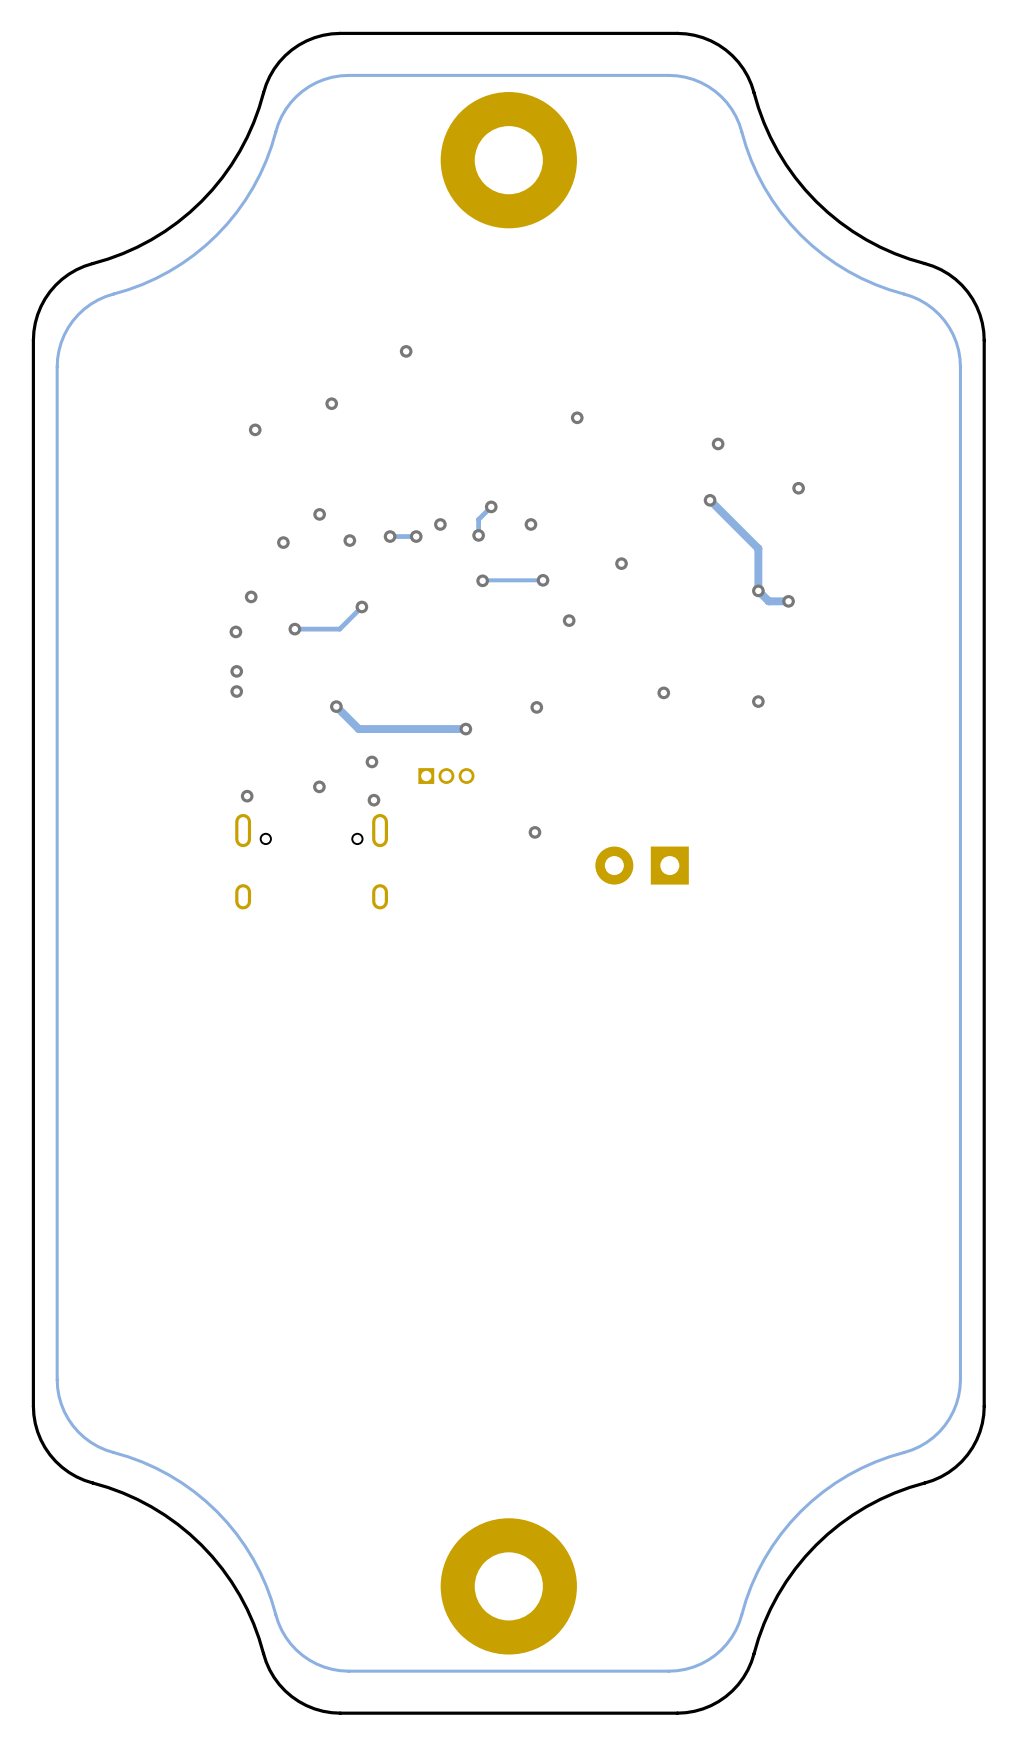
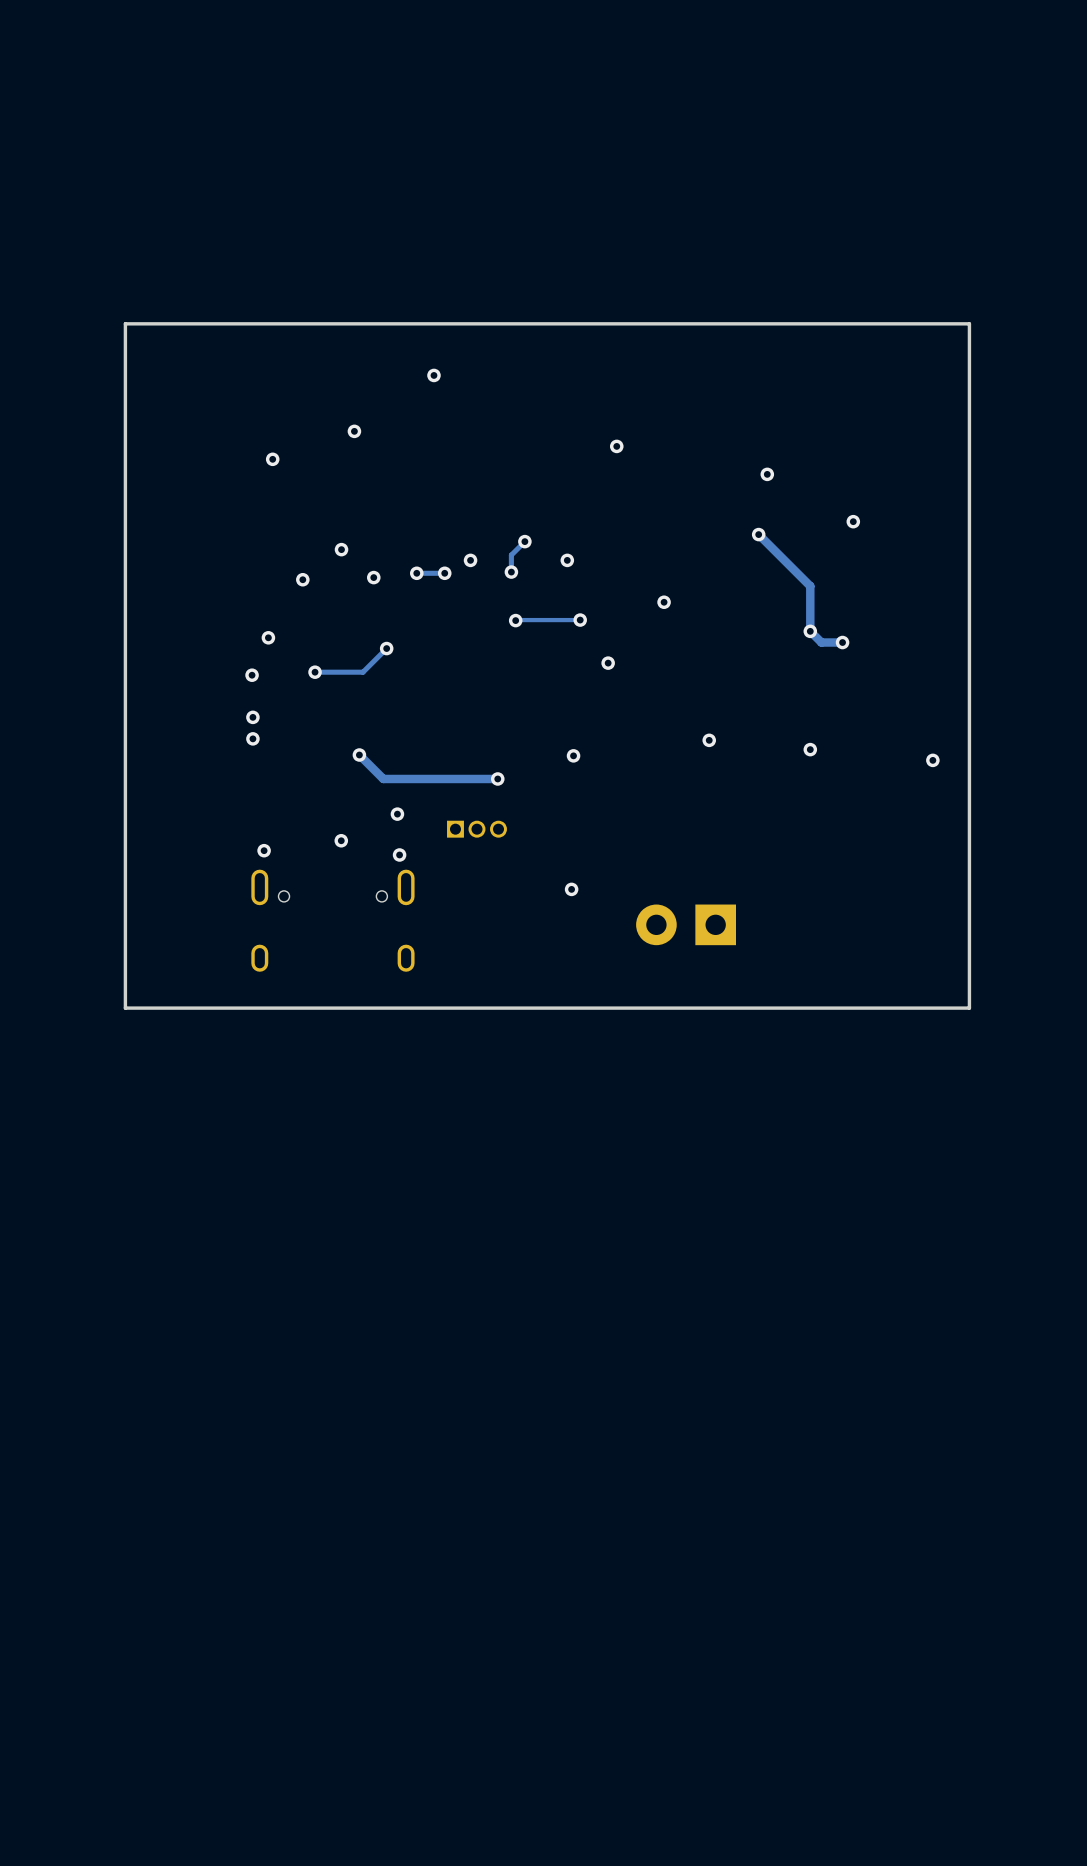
board edge: (677, 33) (340, 33) (323, 35) (306, 40) (291, 49) (274, 69) (266, 84) (253, 122) (239, 151) (222, 177) (201, 201) (177, 222) (151, 239) (122, 253) (84, 266) (69, 274) (55, 285) (45, 298) (35, 323) (33, 340) (33, 1406) (35, 1423) (40, 1440) (49, 1454) (69, 1472) (84, 1480) (122, 1492) (151, 1506) (177, 1524) (201, 1545) (222, 1568) (239, 1595) (253, 1623) (266, 1662) (274, 1677) (285, 1690) (298, 1701) (323, 1711) (340, 1713) (677, 1713) (694, 1711) (711, 1705) (732, 1690) (743, 1677) (751, 1662) (763, 1623) (777, 1595) (795, 1568) (816, 1545) (839, 1524) (866, 1506) (894, 1492) (933, 1480) (948, 1472) (961, 1461) (972, 1447) (982, 1423) (984, 1406) (984, 340) (982, 323) (972, 298) (961, 285) (948, 274) (933, 266) (894, 253) (866, 239) (839, 222) (816, 201) (795, 177) (777, 151) (763, 122) (751, 84) (738, 62) (725, 49) (711, 40) (694, 35) (677, 33) -> none
track: (668, 75) (348, 75) (332, 77) (316, 82) (302, 91) (285, 109) (278, 123) (266, 160) (253, 187) (236, 212) (216, 235) (194, 254) (169, 271) (142, 284) (105, 296) (91, 304) (72, 320) (64, 334) (58, 350) (57, 366) (57, 1379) (58, 1396) (64, 1411) (72, 1425) (91, 1442) (105, 1450) (142, 1461) (169, 1475) (194, 1491) (216, 1511) (236, 1534) (253, 1559) (266, 1586) (278, 1622) (285, 1637) (302, 1655) (316, 1664) (332, 1669) (348, 1671) (668, 1671) (685, 1669) (700, 1664) (715, 1655) (731, 1637) (739, 1622) (751, 1586) (764, 1559) (780, 1534) (800, 1511) (823, 1491) (848, 1475) (875, 1461) (911, 1450) (926, 1442) (944, 1425) (953, 1411) (958, 1396) (960, 1379) (960, 366) (958, 350) (953, 334) (944, 320) (926, 304) (911, 296) (875, 284) (848, 271) (823, 254) (800, 235) (780, 212) (764, 187) (751, 160) (739, 123) (726, 102) (715, 91) (700, 82) (685, 77) (668, 75) -> none
part: (508, 160) -> none
board edge: none -> (969, 323) (125, 323) (125, 1008) (969, 1008) (969, 323)
via: none -> (932, 760)
part: (508, 1586) -> none

